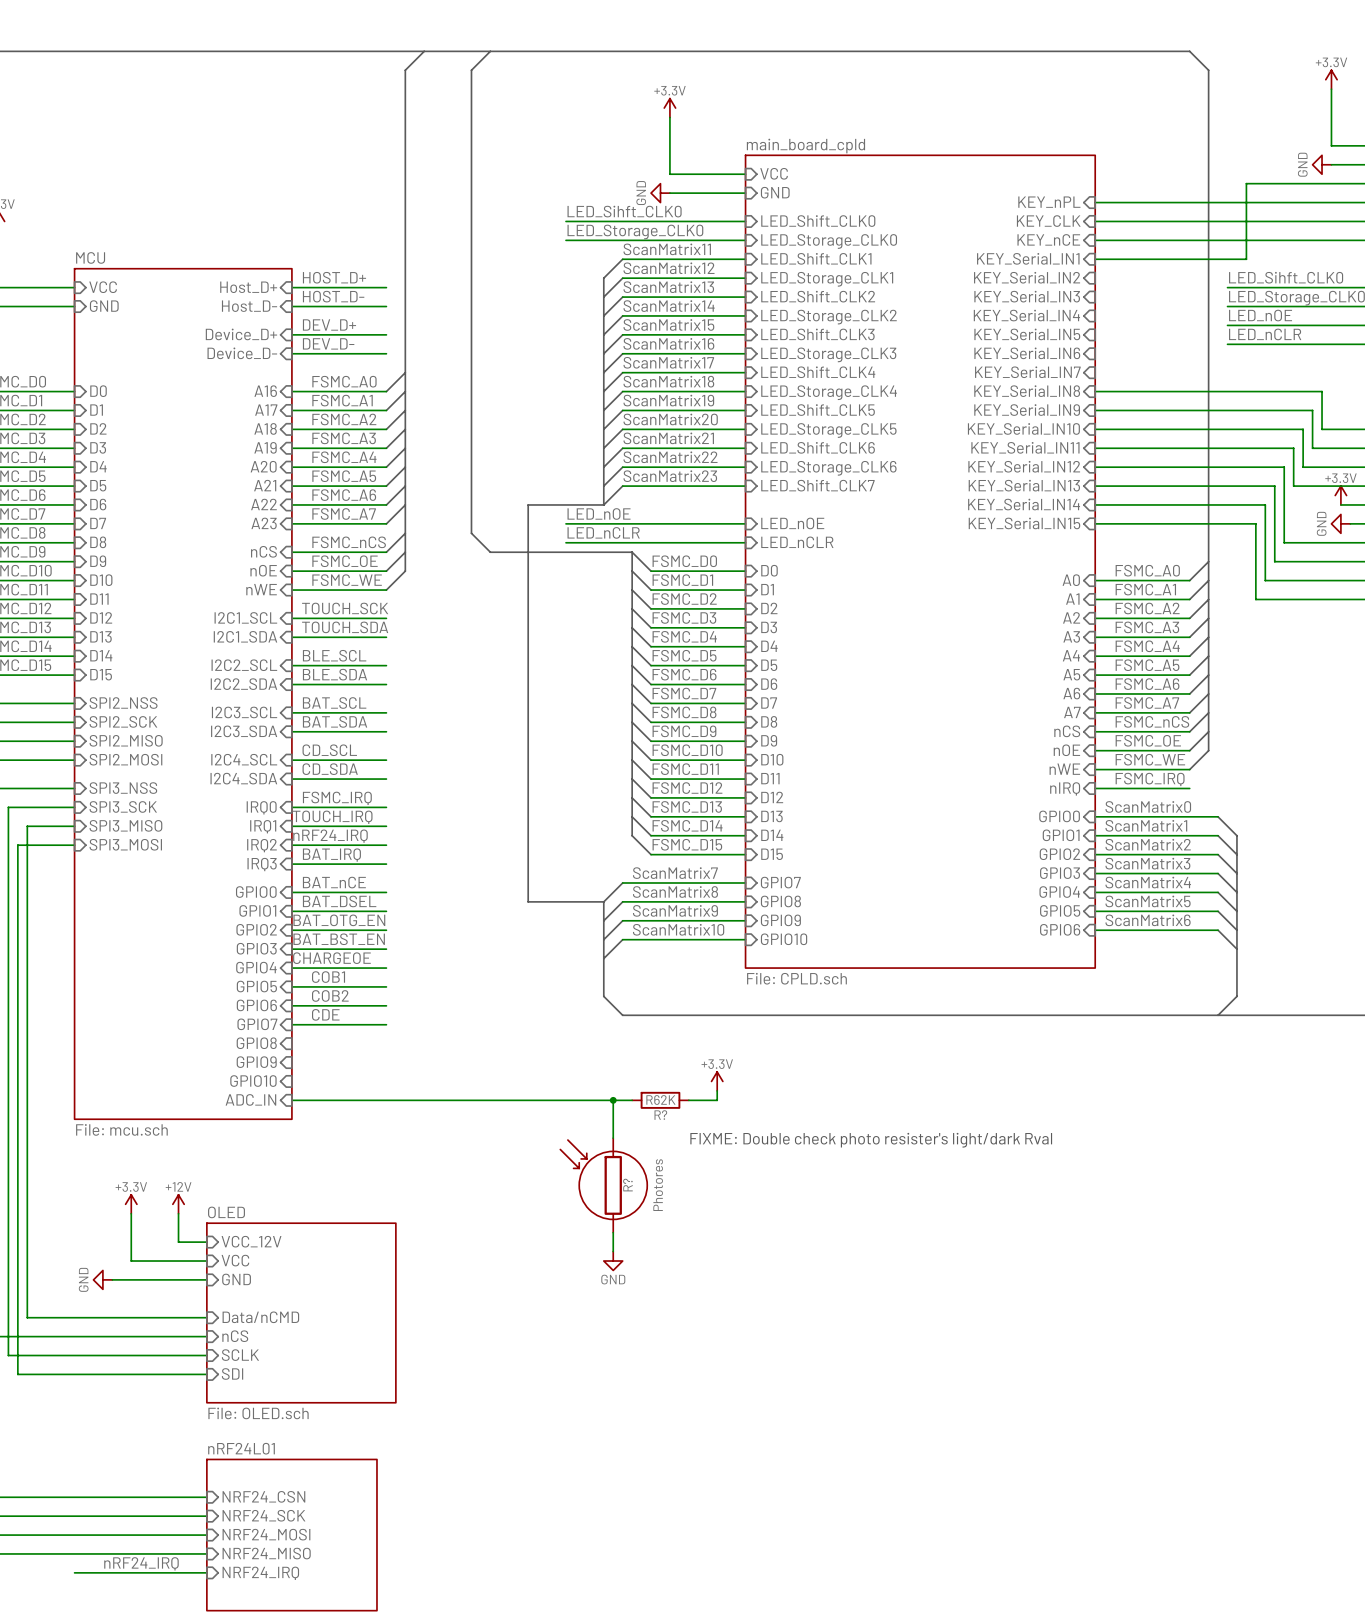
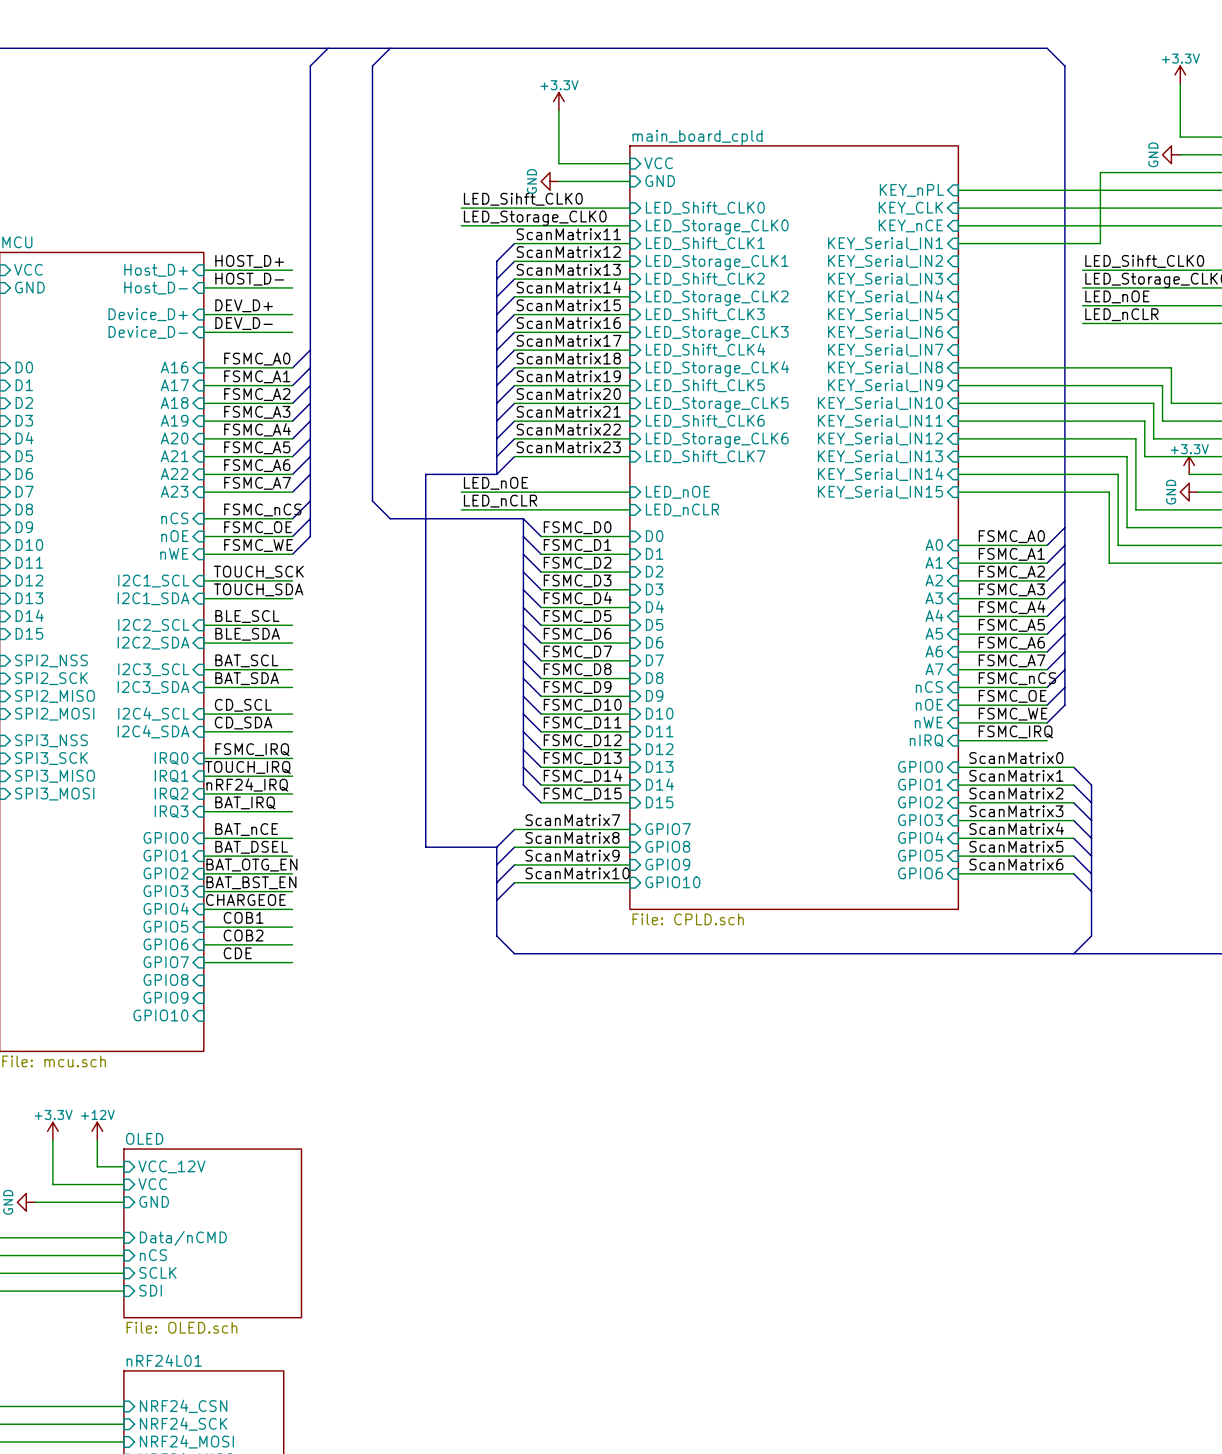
power symbol: +3.3V (717, 1081) -> none
wire: (717, 1090) (717, 1100) (688, 1100) -> none
sheet pin: ADC_IN (250, 1099) -> none
wire: (291, 1100) (632, 1100) -> none
wire: (613, 1100) (613, 1138) -> none
junction: (613, 1100) -> none
R?: R62K (660, 1100) -> none
text: FIXME: Double check photo resister's light/dark Rval (871, 1140) -> none
R?: Photores (603, 1185) -> none
wire: (613, 1232) (613, 1251) -> none
power symbol: GND (613, 1261) -> none

